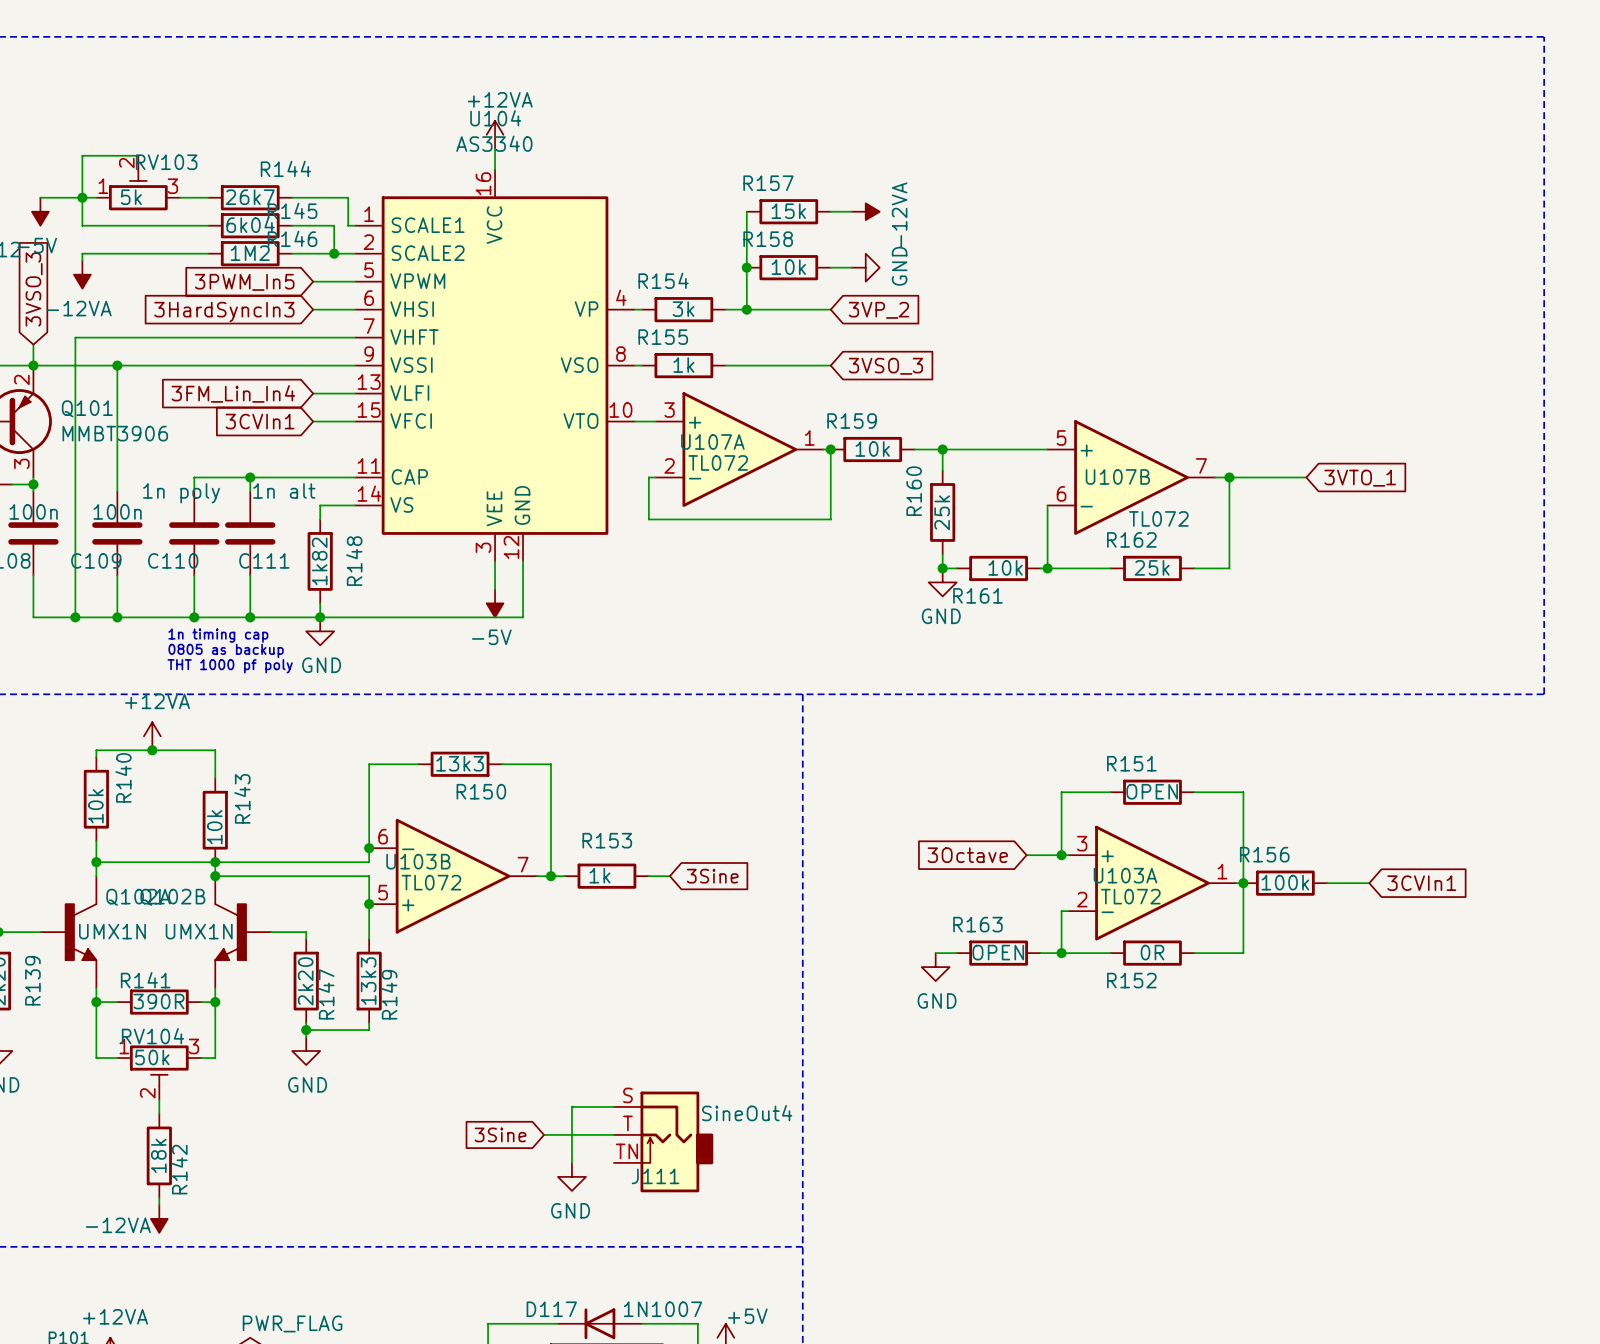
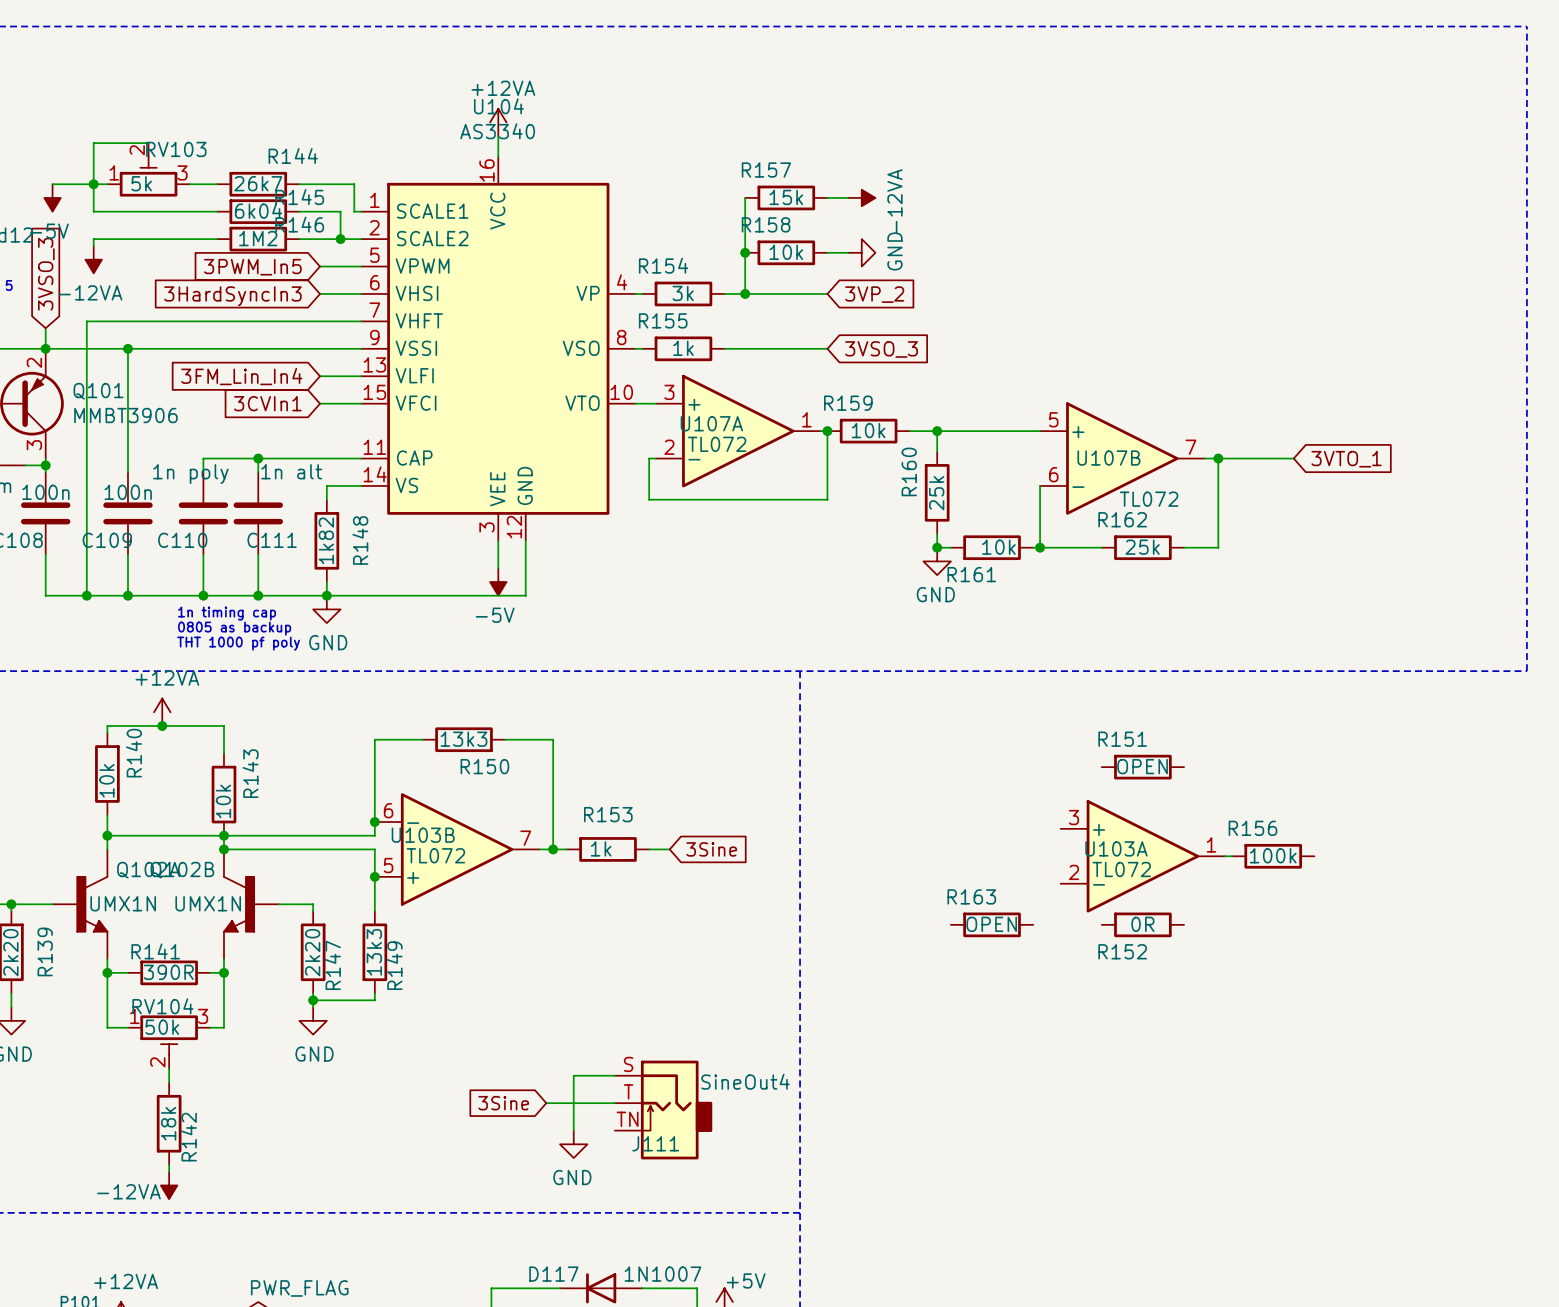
wire: (1110, 792) (1061, 792) (1061, 855) -> none
wire: (1194, 792) (1243, 792) (1243, 953) (1194, 953) -> none
global label: 3Octave (967, 855) -> none
wire: (1026, 855) (1068, 855) -> none
junction: (1061, 855) -> none
junction: (1243, 883) -> none
wire: (1327, 883) (1369, 883) -> none
global label: 3CVIn1 (1421, 883) -> none
wire: (1068, 911) (1061, 911) (1061, 953) -> none
wire: (935, 953) (956, 953) -> none
wire: (1040, 953) (1110, 953) -> none
junction: (1061, 953) -> none
power symbol: GND (935, 967) -> none

